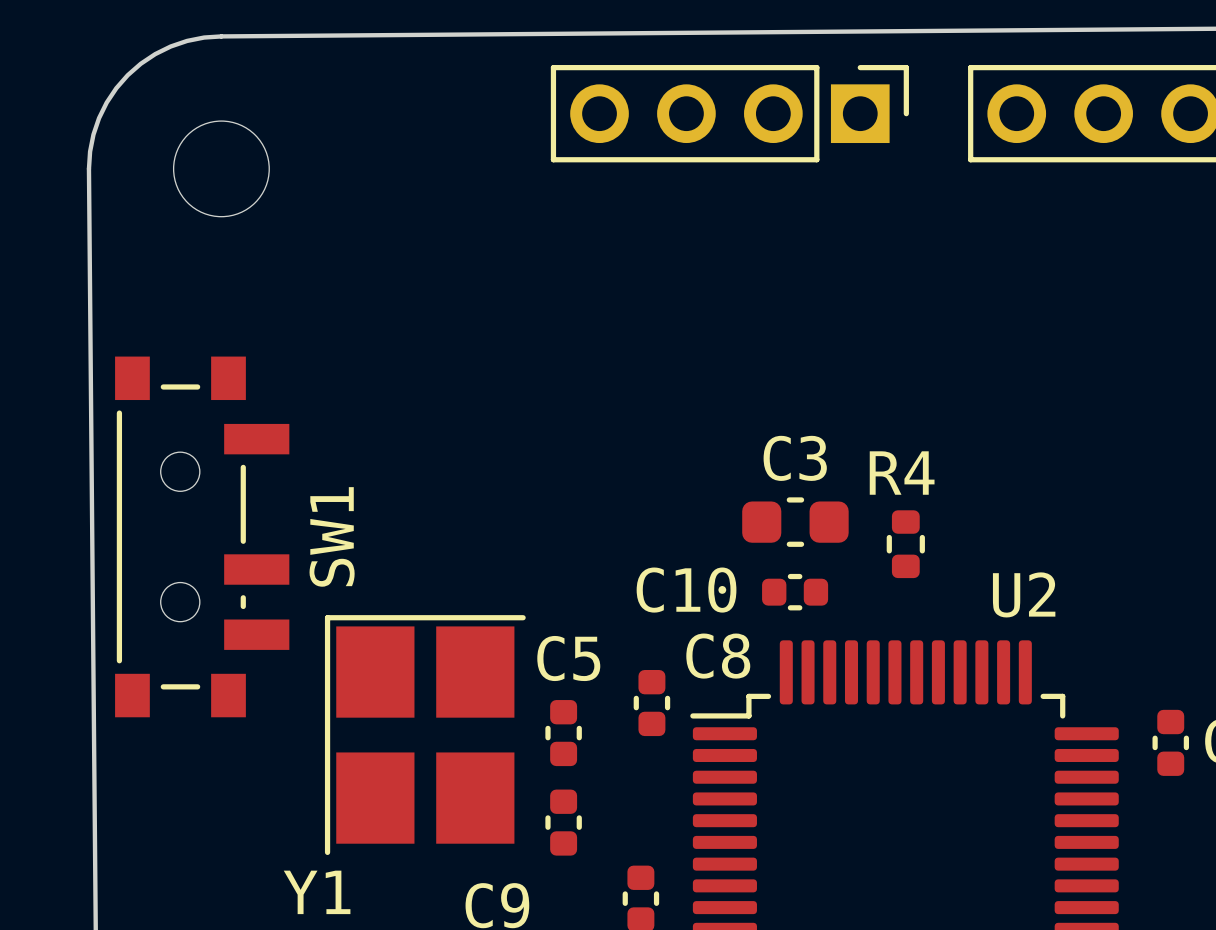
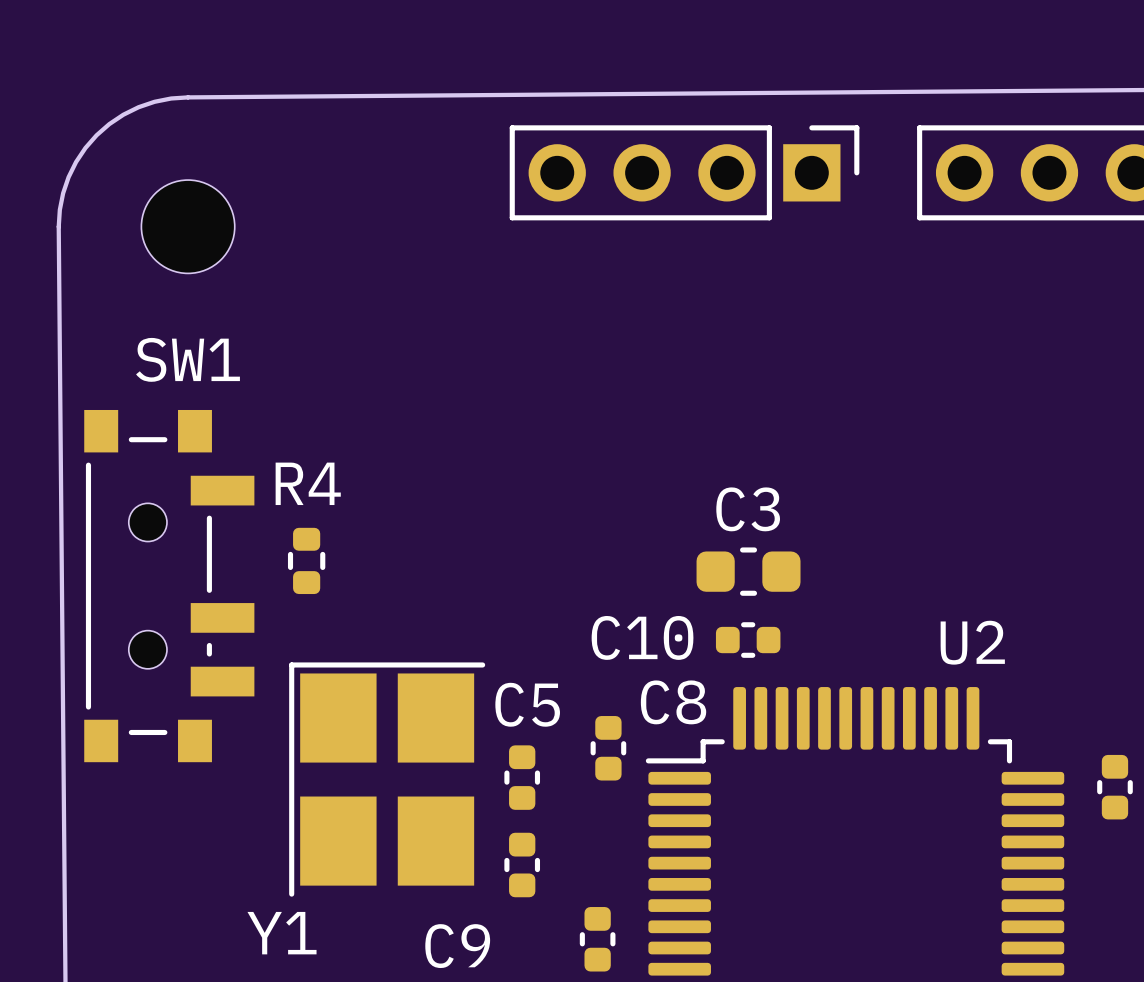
R4 name position: R4 (902, 473) -> R4 (308, 483)
SW1 name rotation: 0° (332, 536) -> 90° clockwise (188, 359)
SW1 name position: SW1 (332, 536) -> SW1 (188, 359)
R4 position: (905, 544) -> (306, 560)

